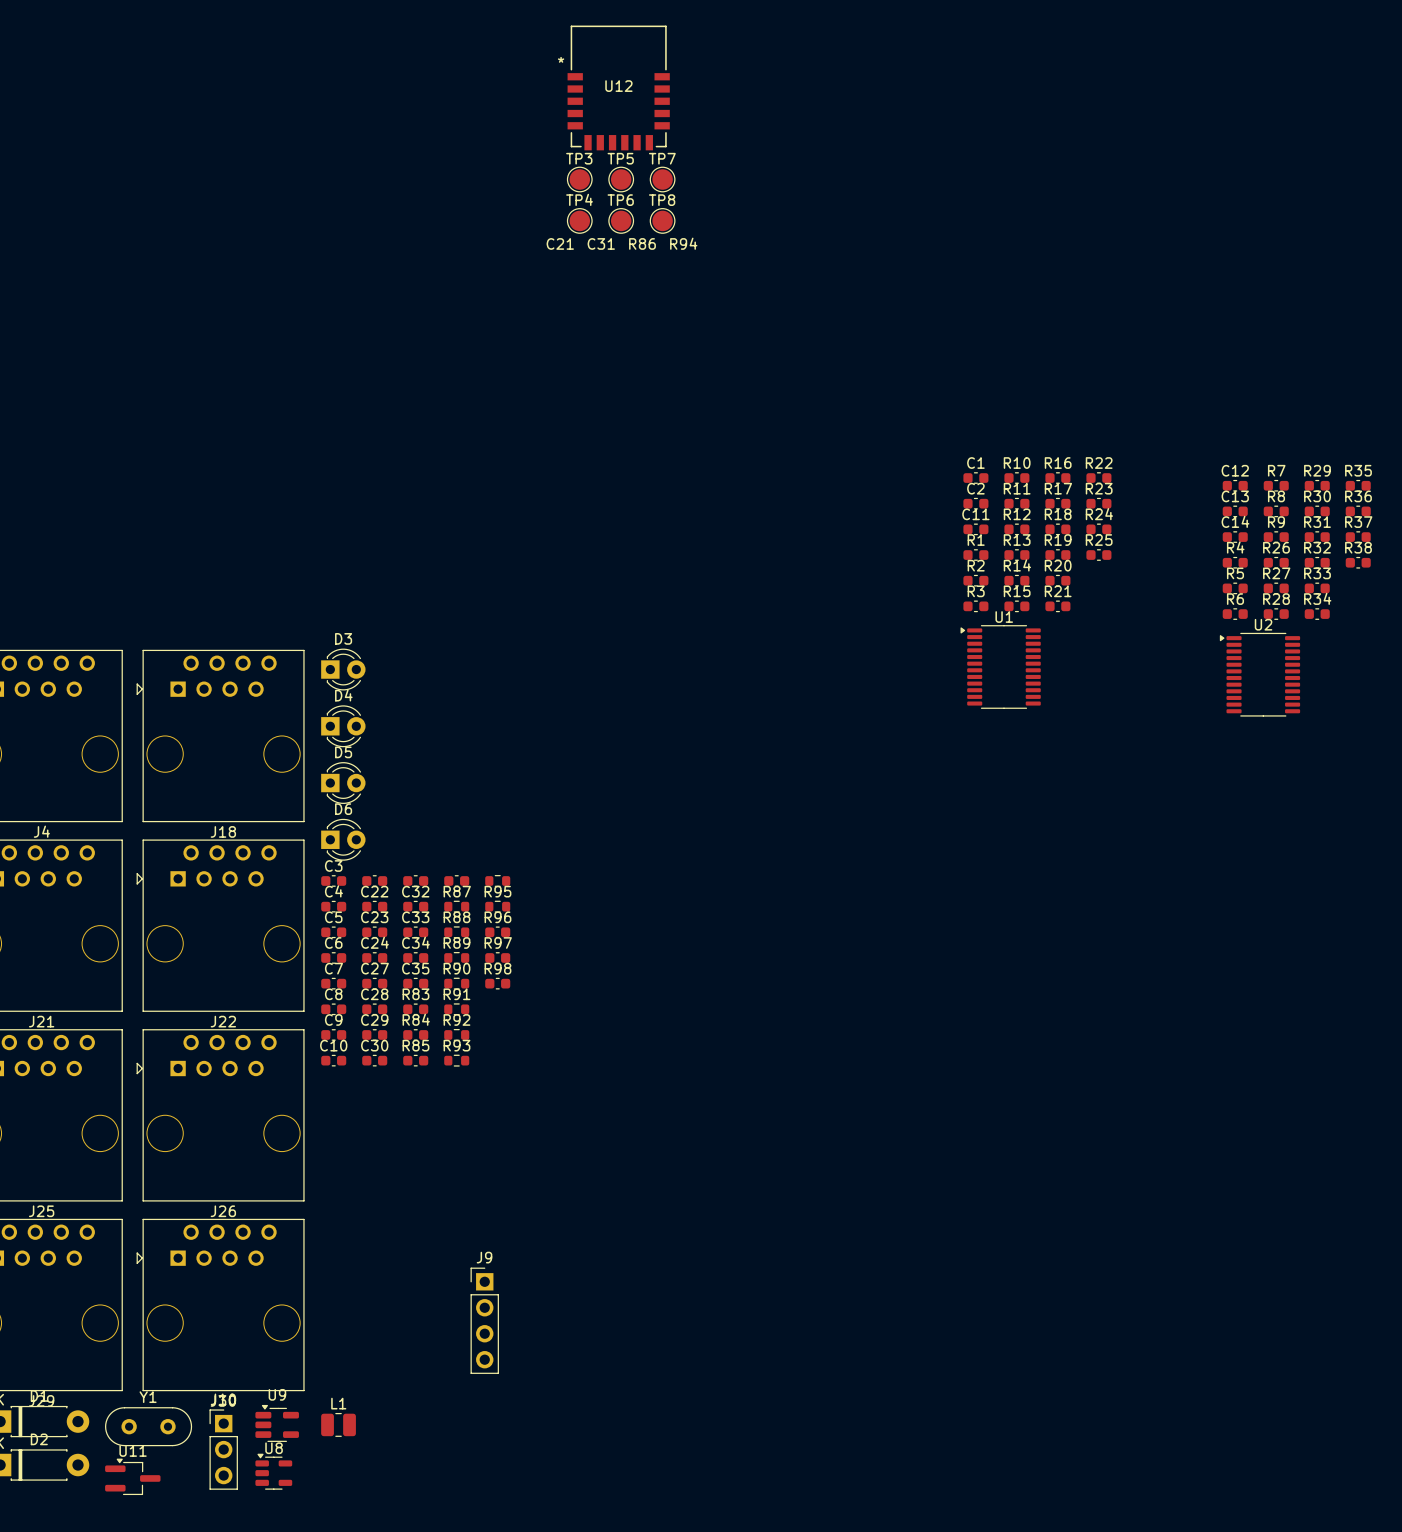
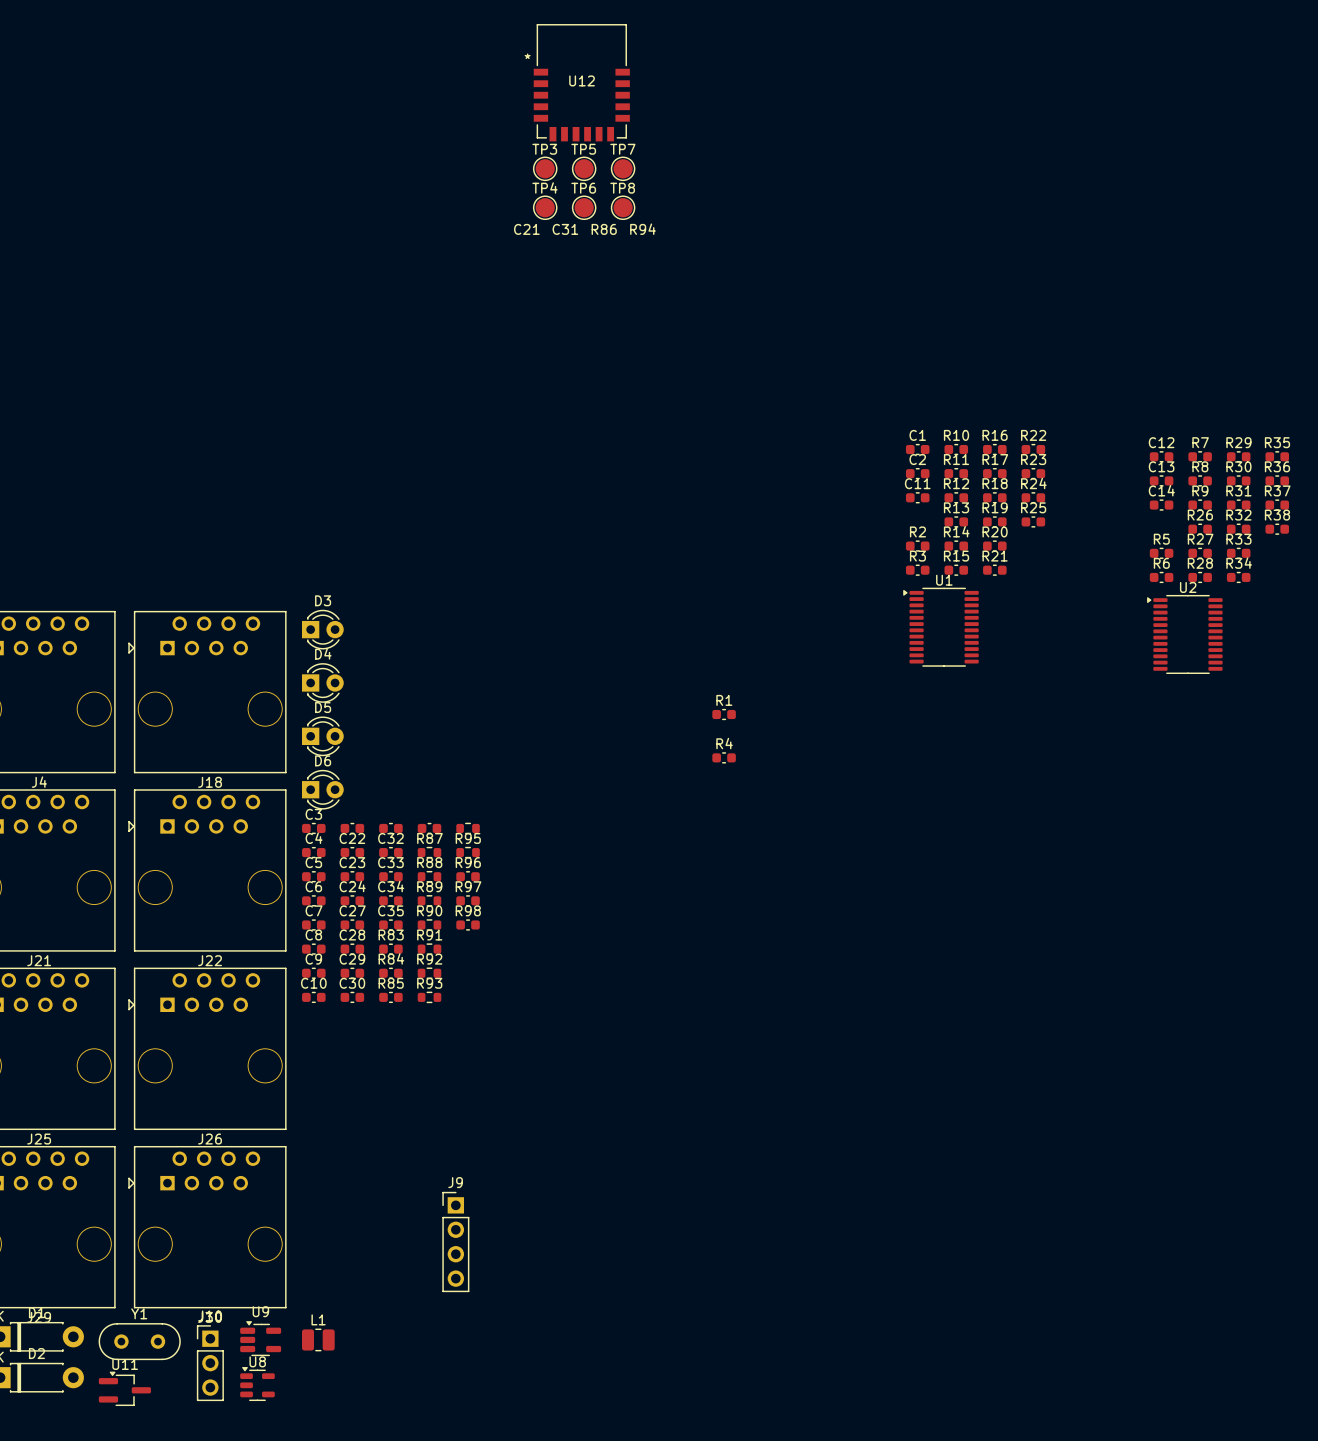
R1 position: (975, 555) -> (724, 714)
R4 position: (1235, 562) -> (724, 757)

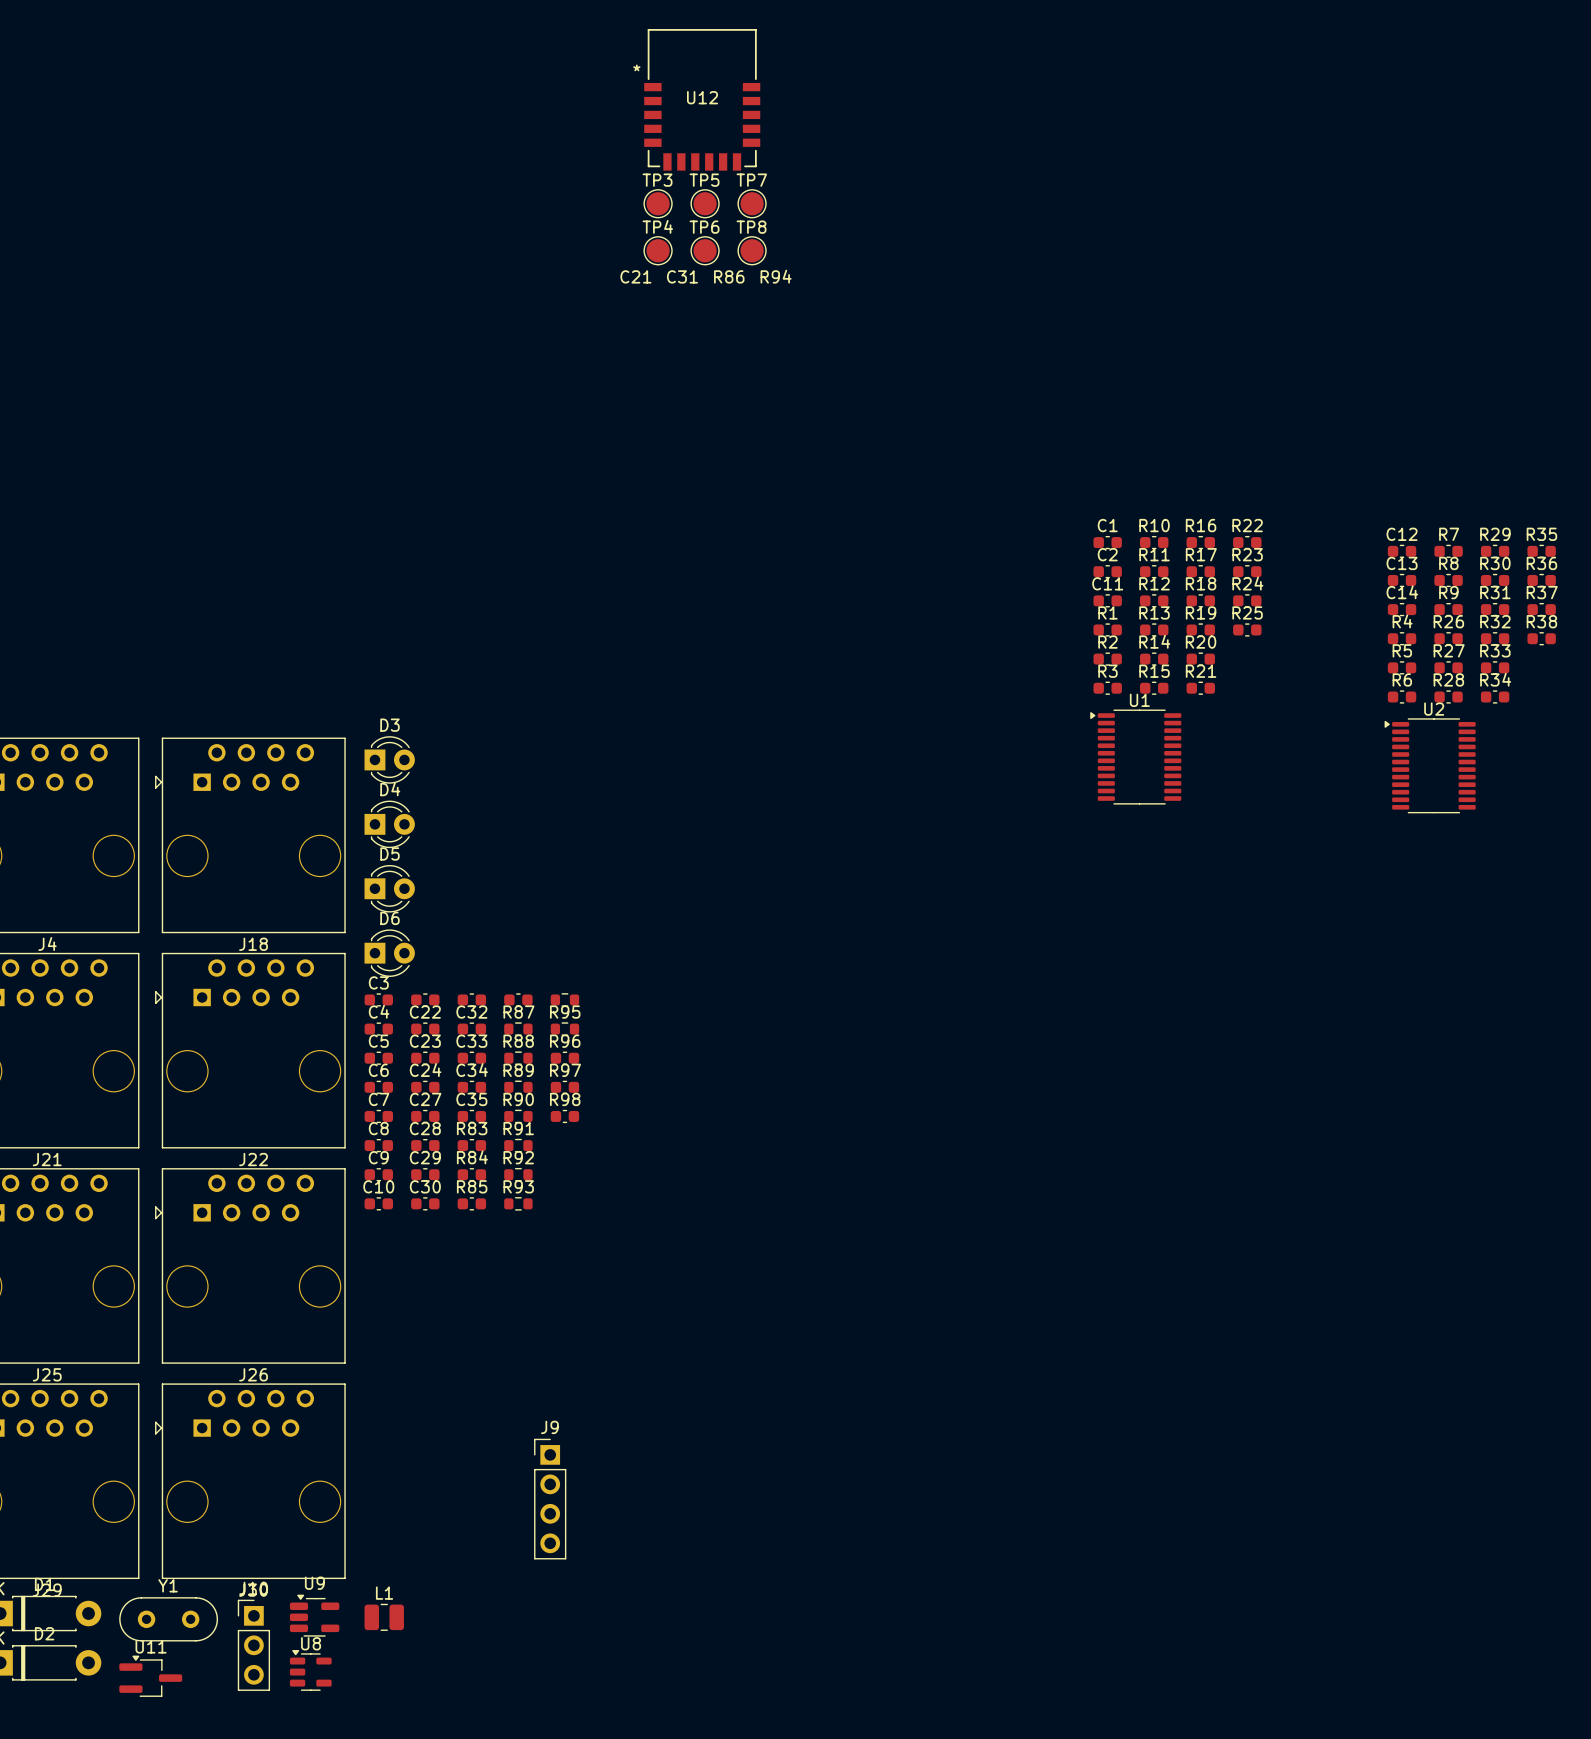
R1 position: (724, 714) -> (1107, 629)
R4 position: (724, 757) -> (1402, 638)

